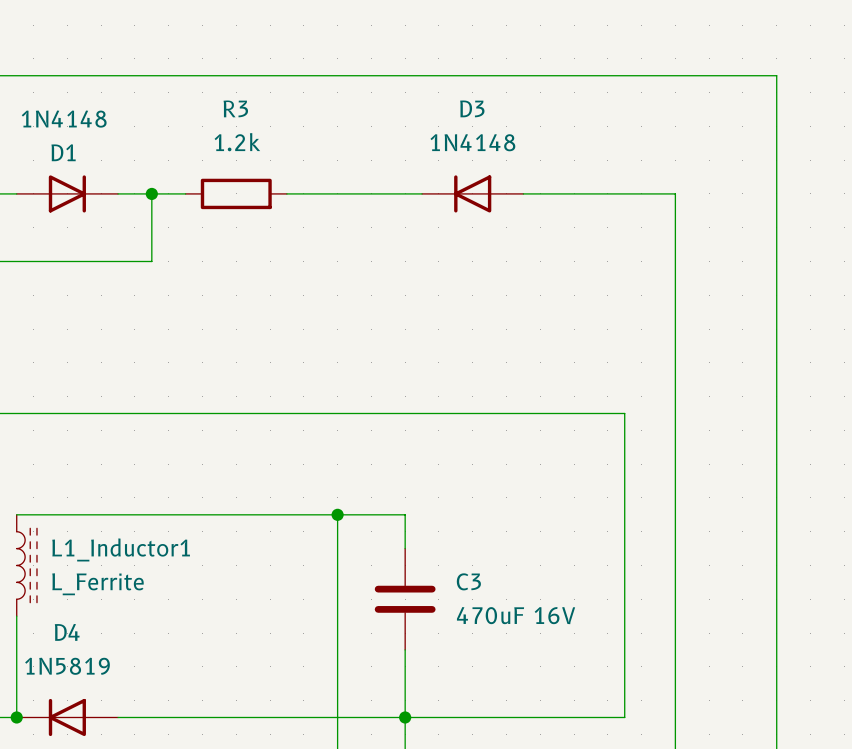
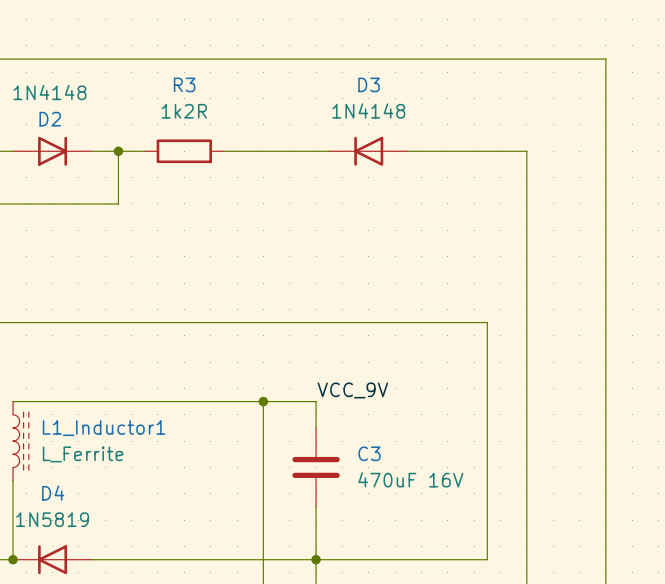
R3 value: 1.2k (237, 142) -> 1k2R (184, 111)
D1 name: D1 (63, 152) -> D2 (50, 119)
label: none -> VCC_9V (352, 390)

